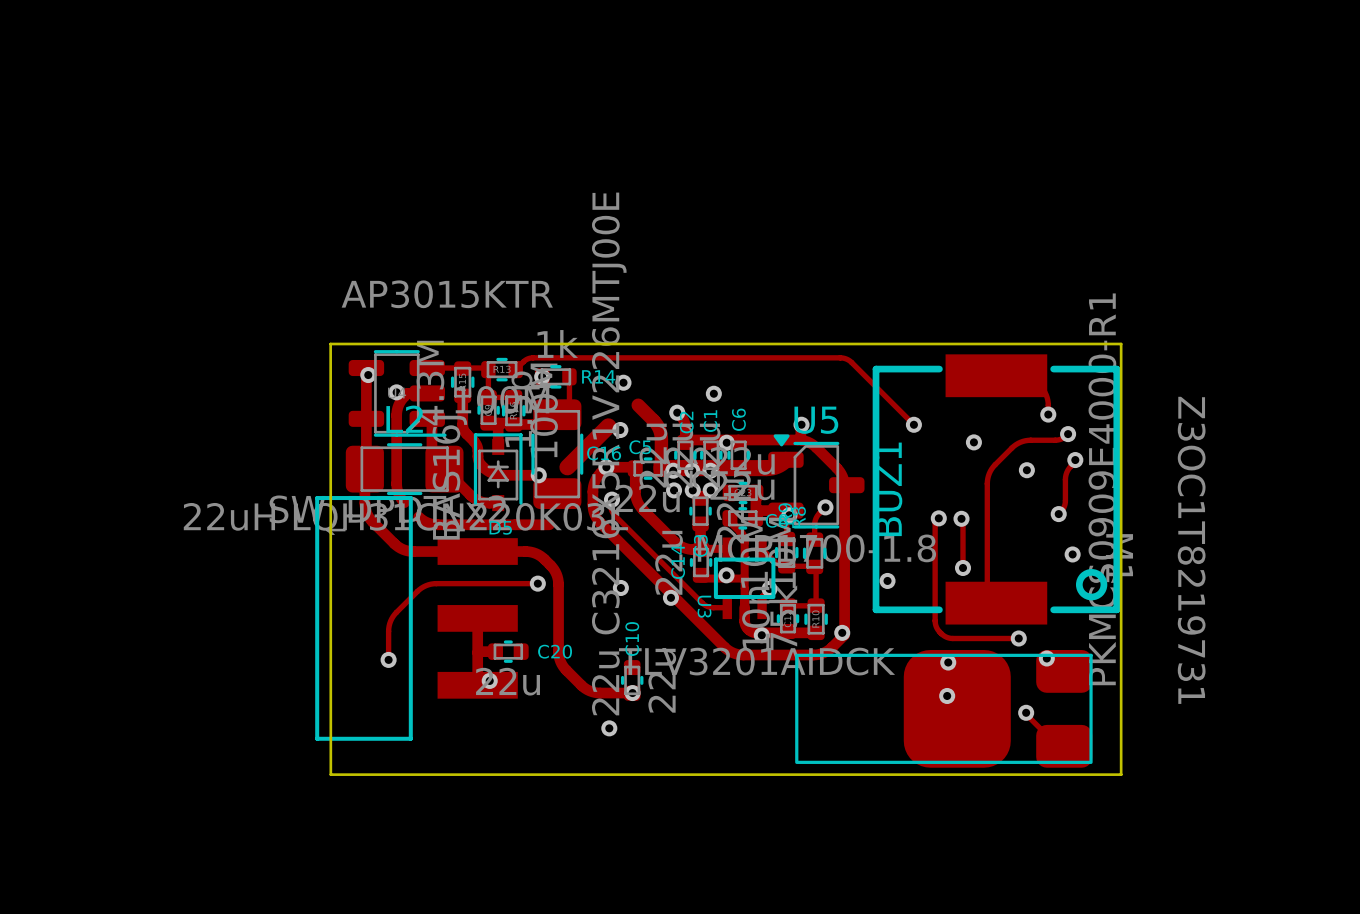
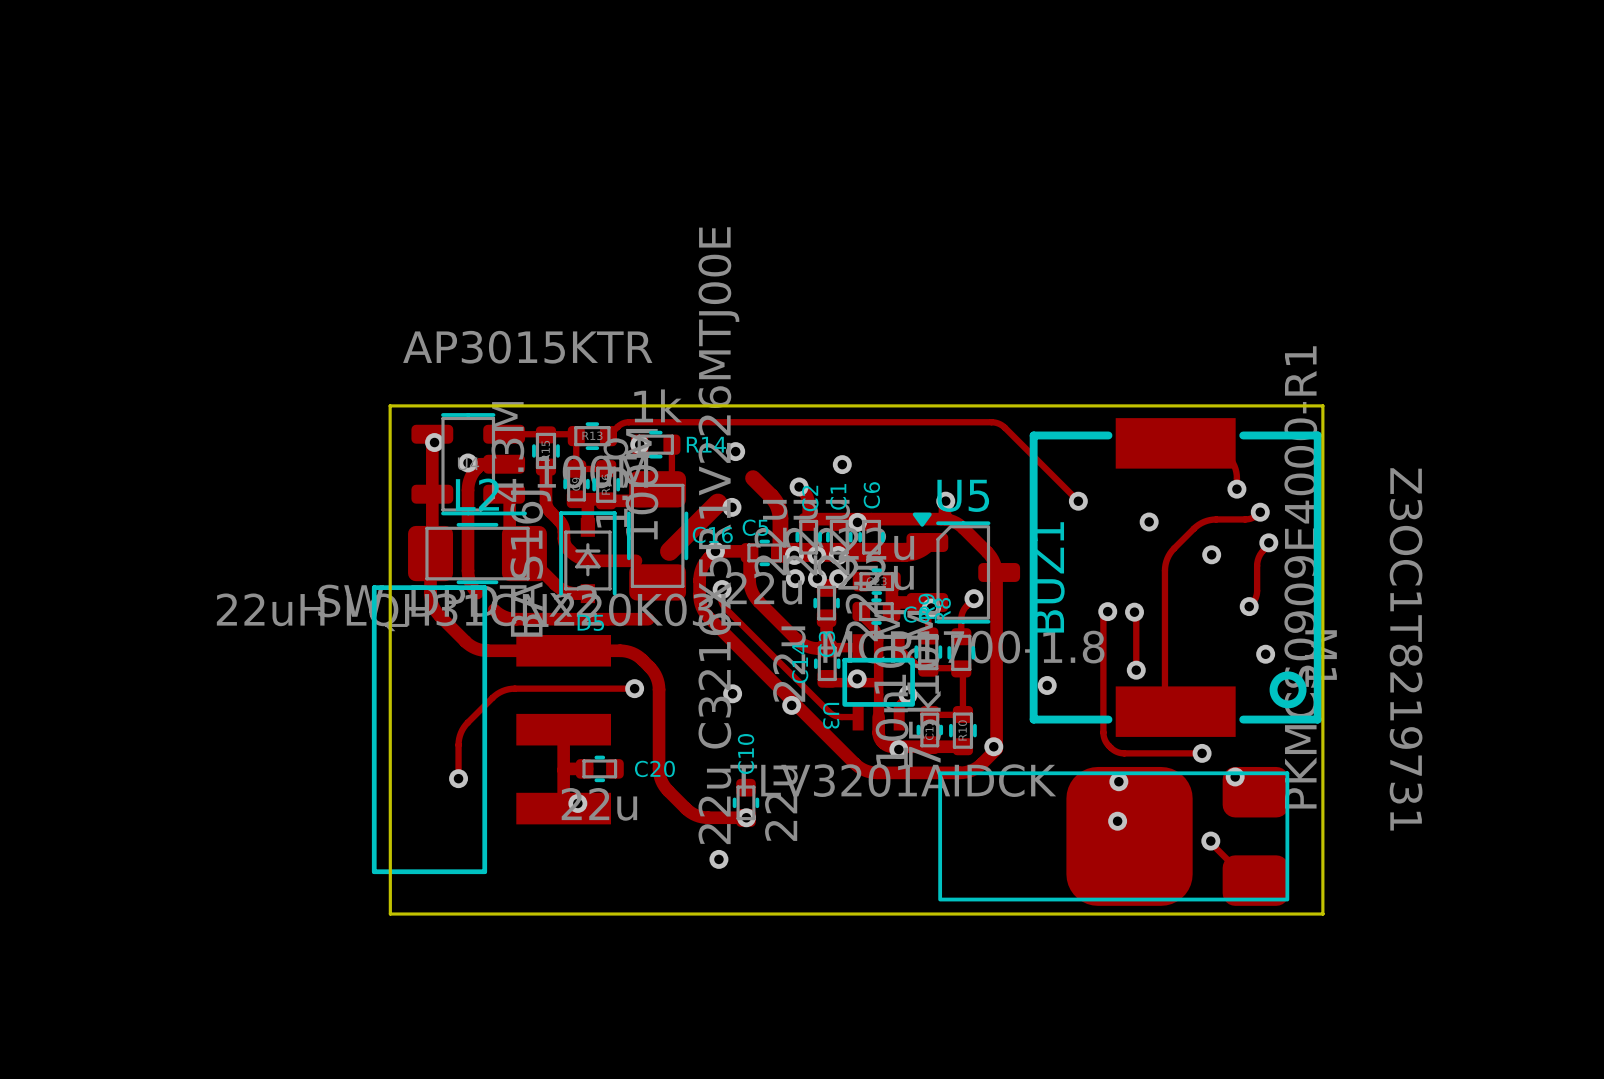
via: (538, 475) -> none

